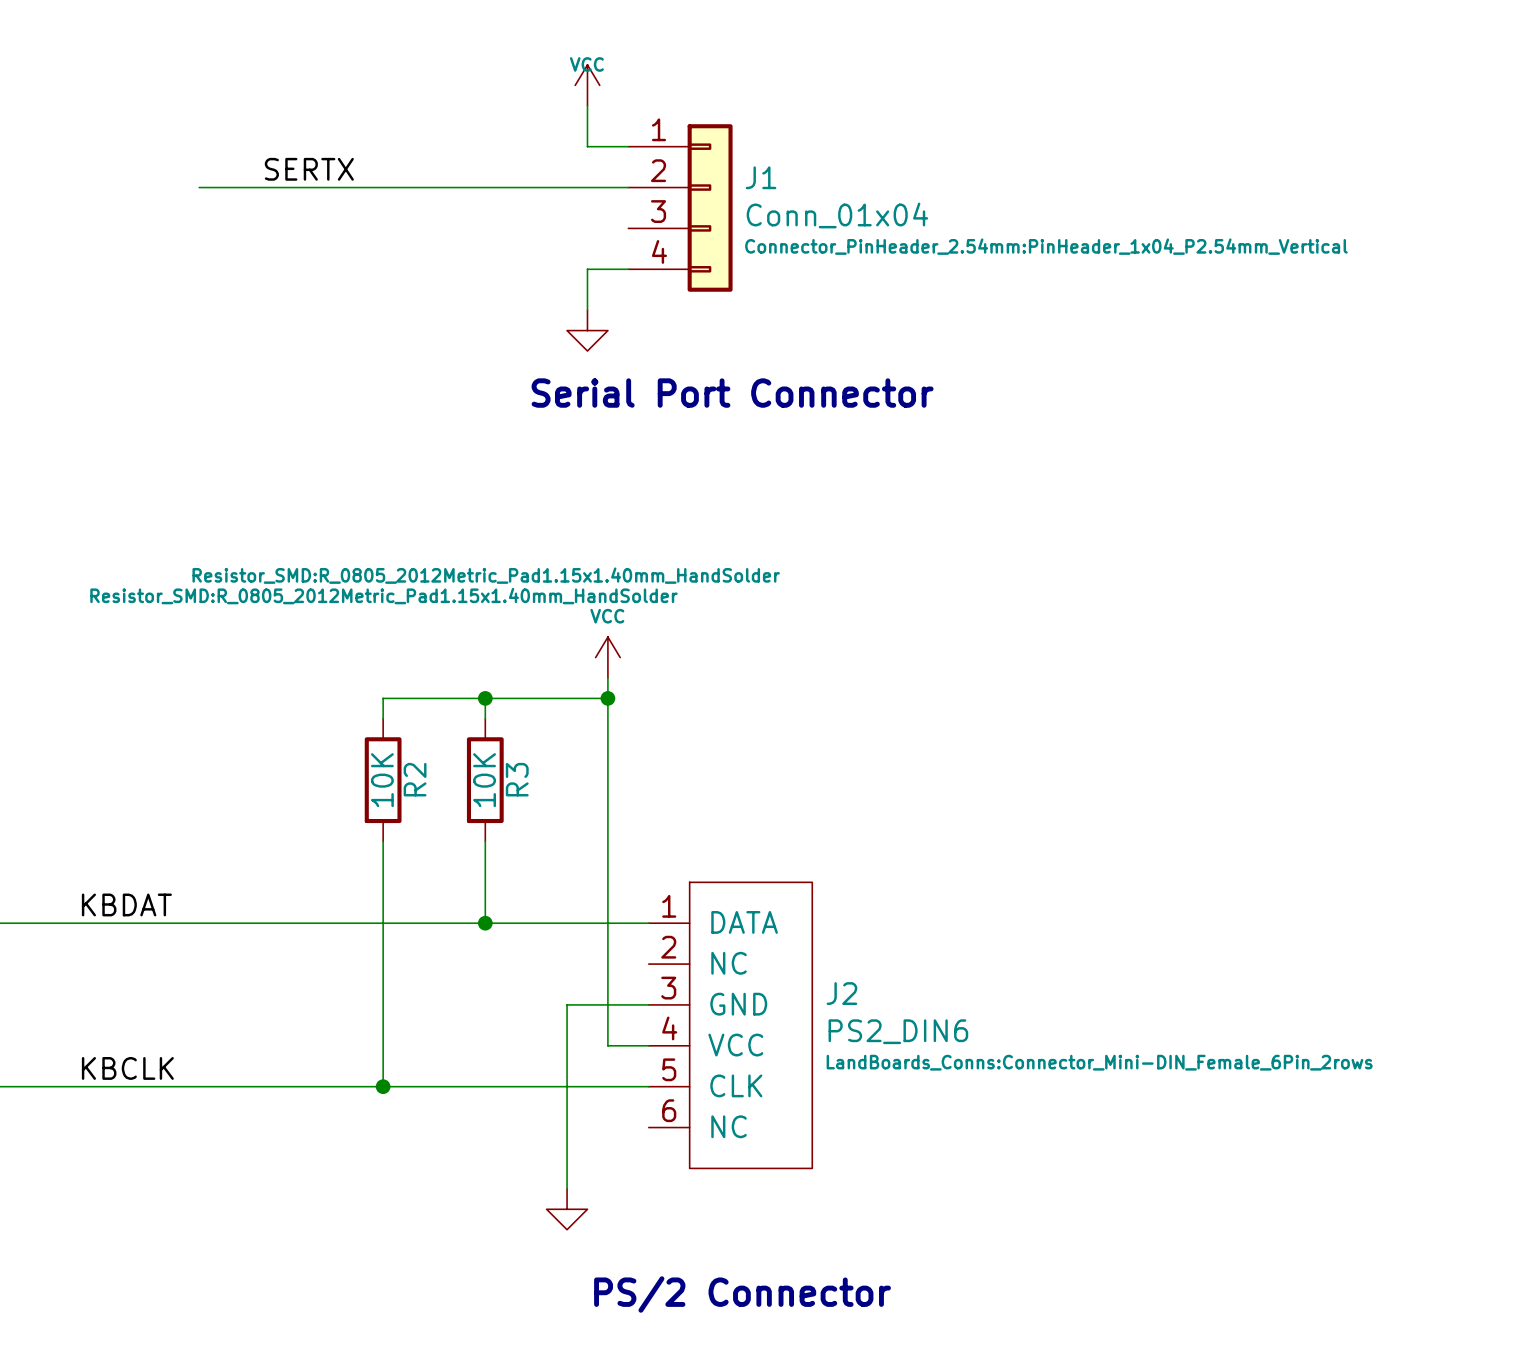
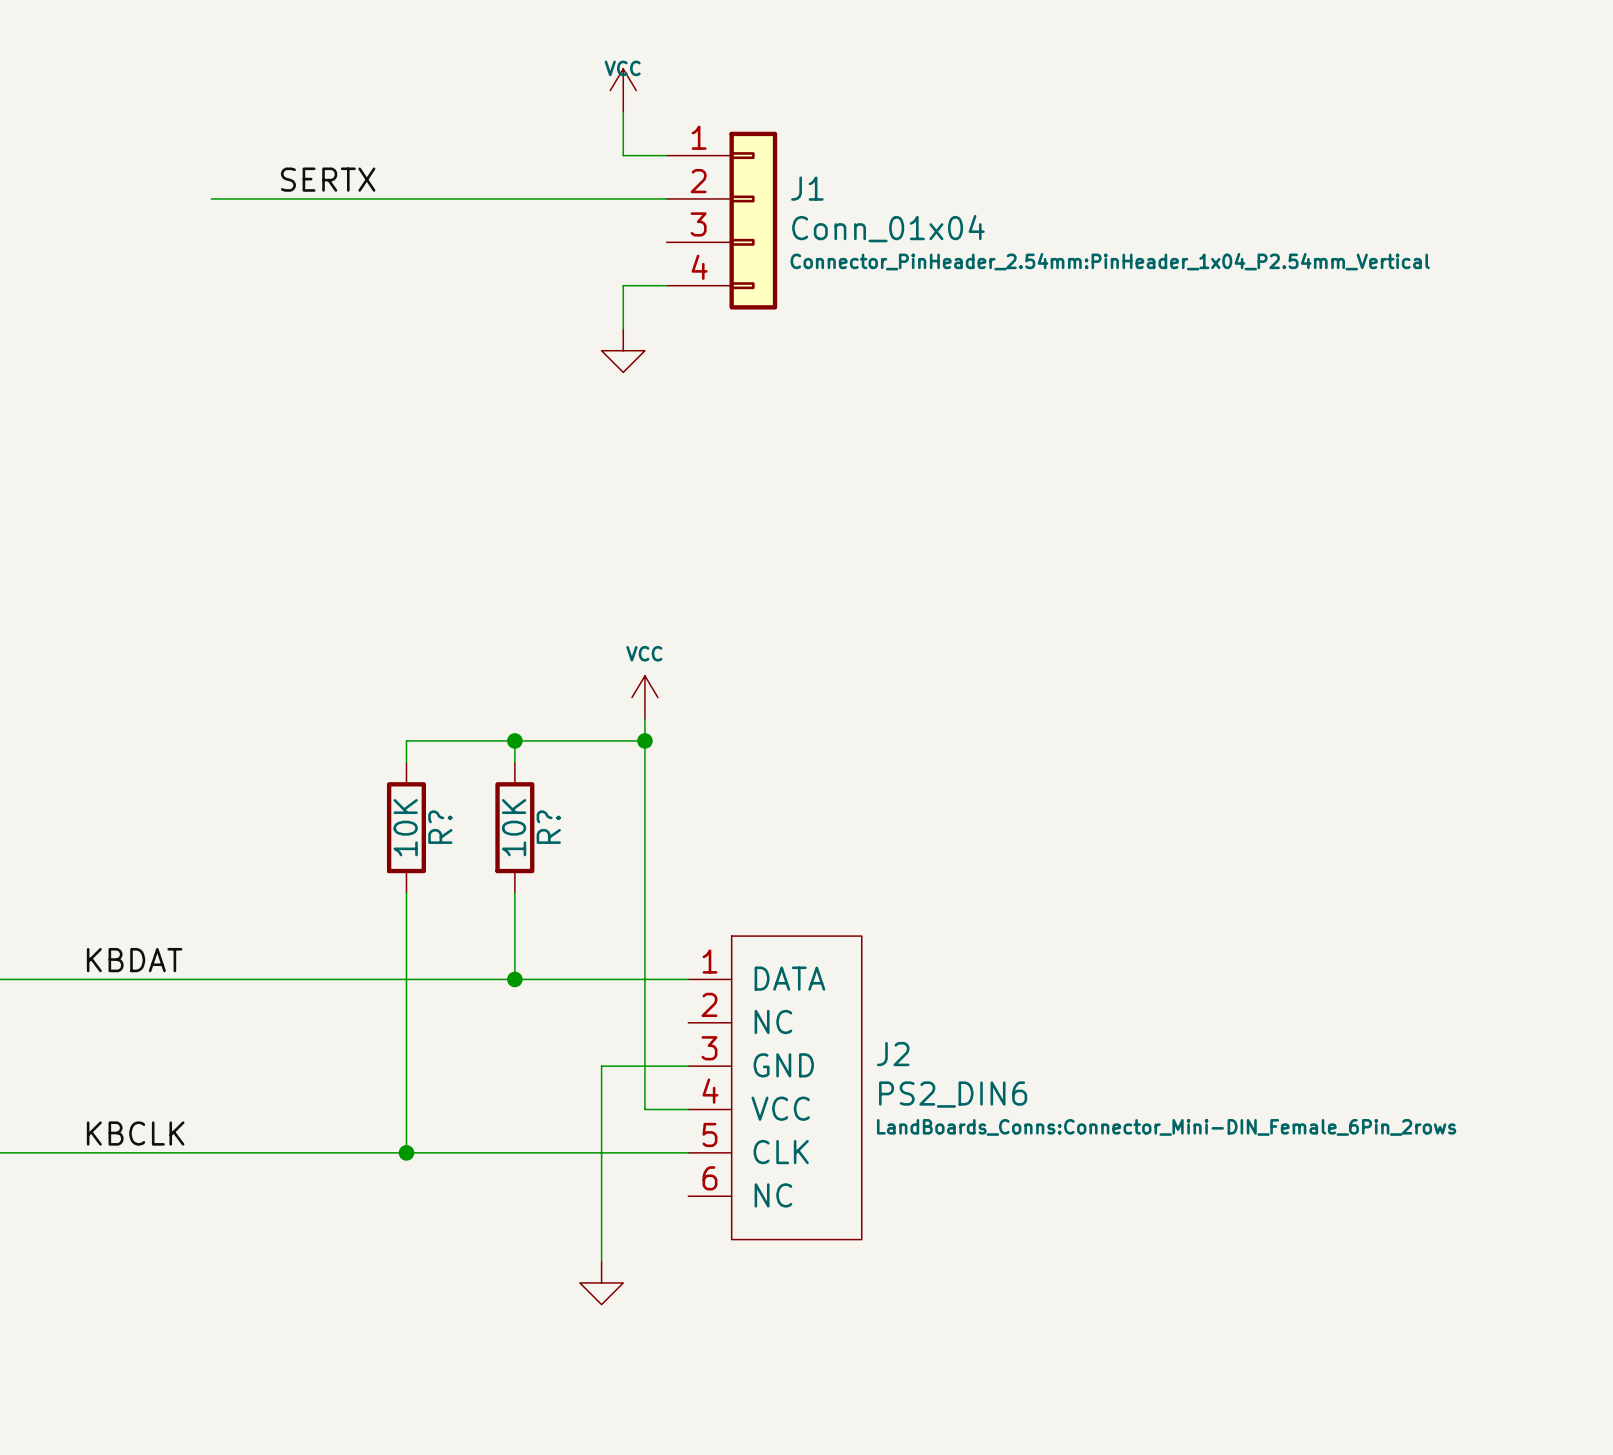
text: Serial Port Connector (732, 393) -> none
R3 text: Resistor_SMD:R_0805_2012Metric_Pad1.15x1.40mm_HandSolder (486, 575) -> none
R2 text: Resistor_SMD:R_0805_2012Metric_Pad1.15x1.40mm_HandSolder (384, 596) -> none
R2 name: R2 (415, 779) -> R? (440, 827)
R3 name: R3 (517, 779) -> R? (548, 827)
text: PS/2 Connector (742, 1294) -> none

